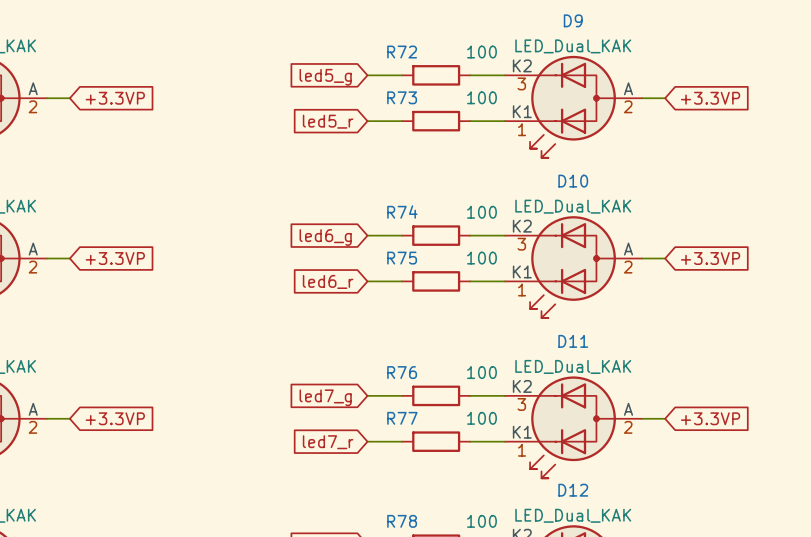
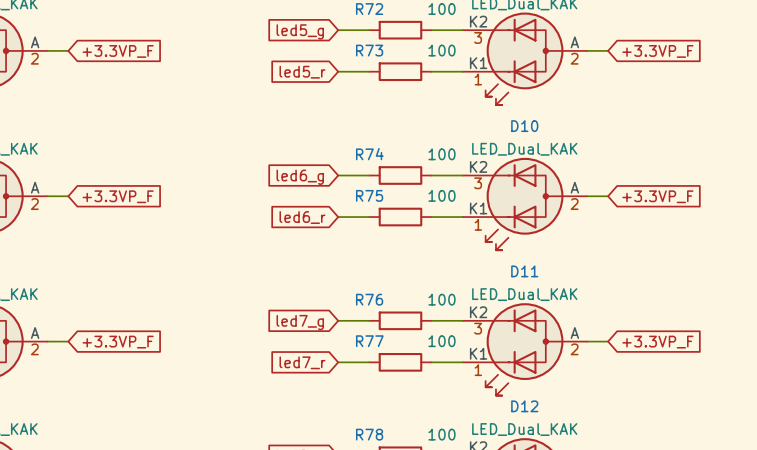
global label: +3.3VP (115, 98) -> +3.3VP_F (118, 51)
global label: +3.3VP (710, 98) -> +3.3VP_F (657, 51)
global label: +3.3VP (115, 258) -> +3.3VP_F (118, 196)
global label: +3.3VP (710, 258) -> +3.3VP_F (657, 196)
global label: +3.3VP (115, 418) -> +3.3VP_F (118, 342)
global label: +3.3VP (710, 418) -> +3.3VP_F (657, 342)

